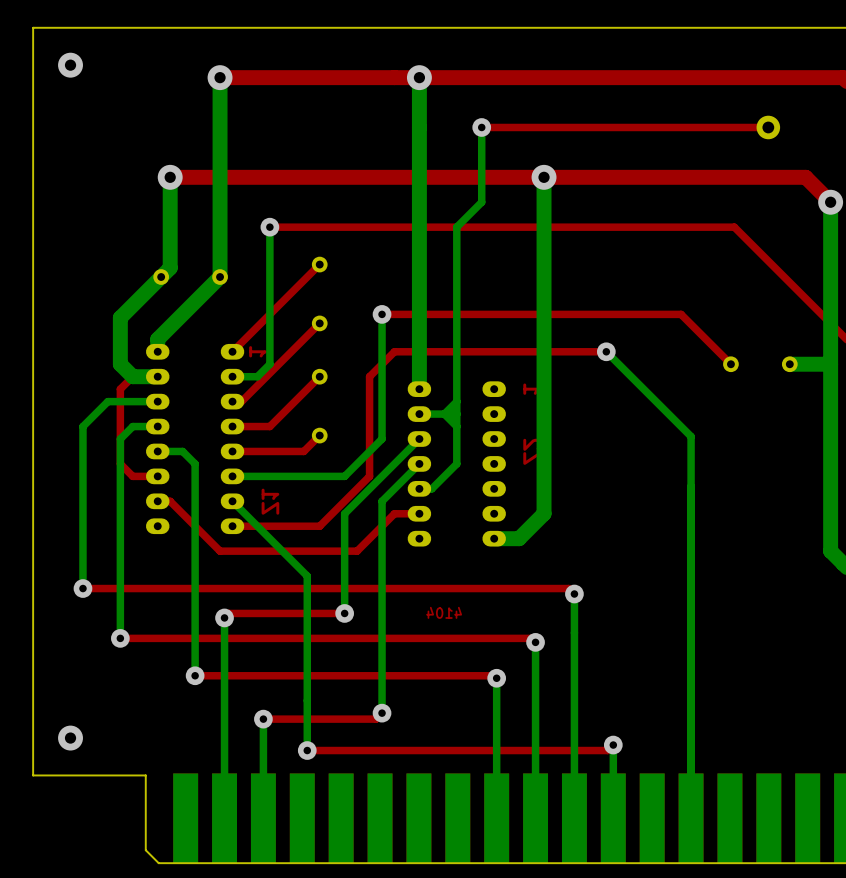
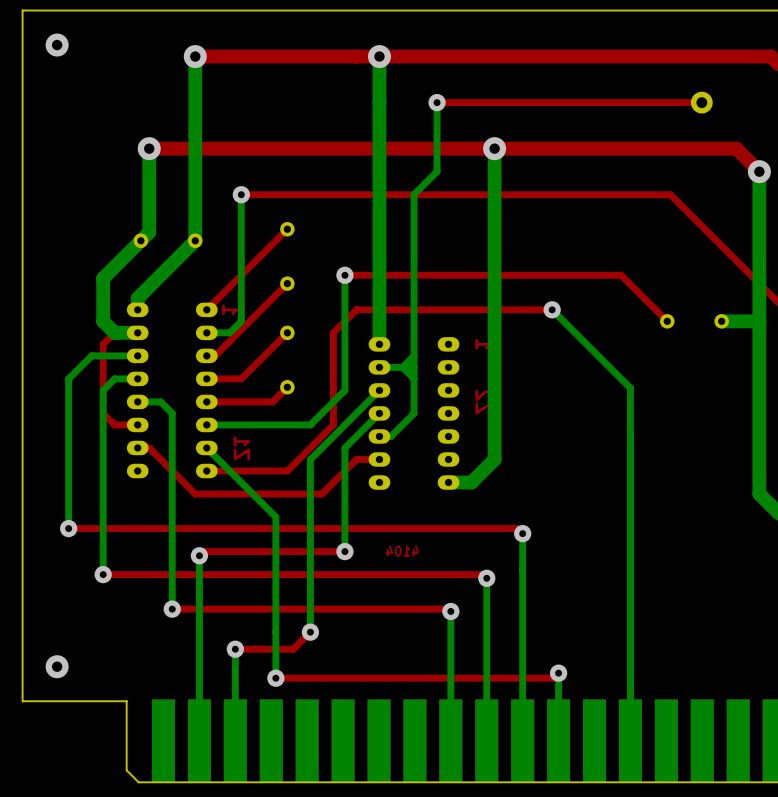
bottom track: none -> (310, 551) (310, 632)
via position: (344, 613) -> (344, 551)
bottom track: (382, 613) (382, 713) -> none
top track: none -> (344, 551) (310, 551)
top track: (382, 713) (376, 719) (326, 719) -> (310, 632) (293, 649)
via position: (382, 713) -> (310, 632)

